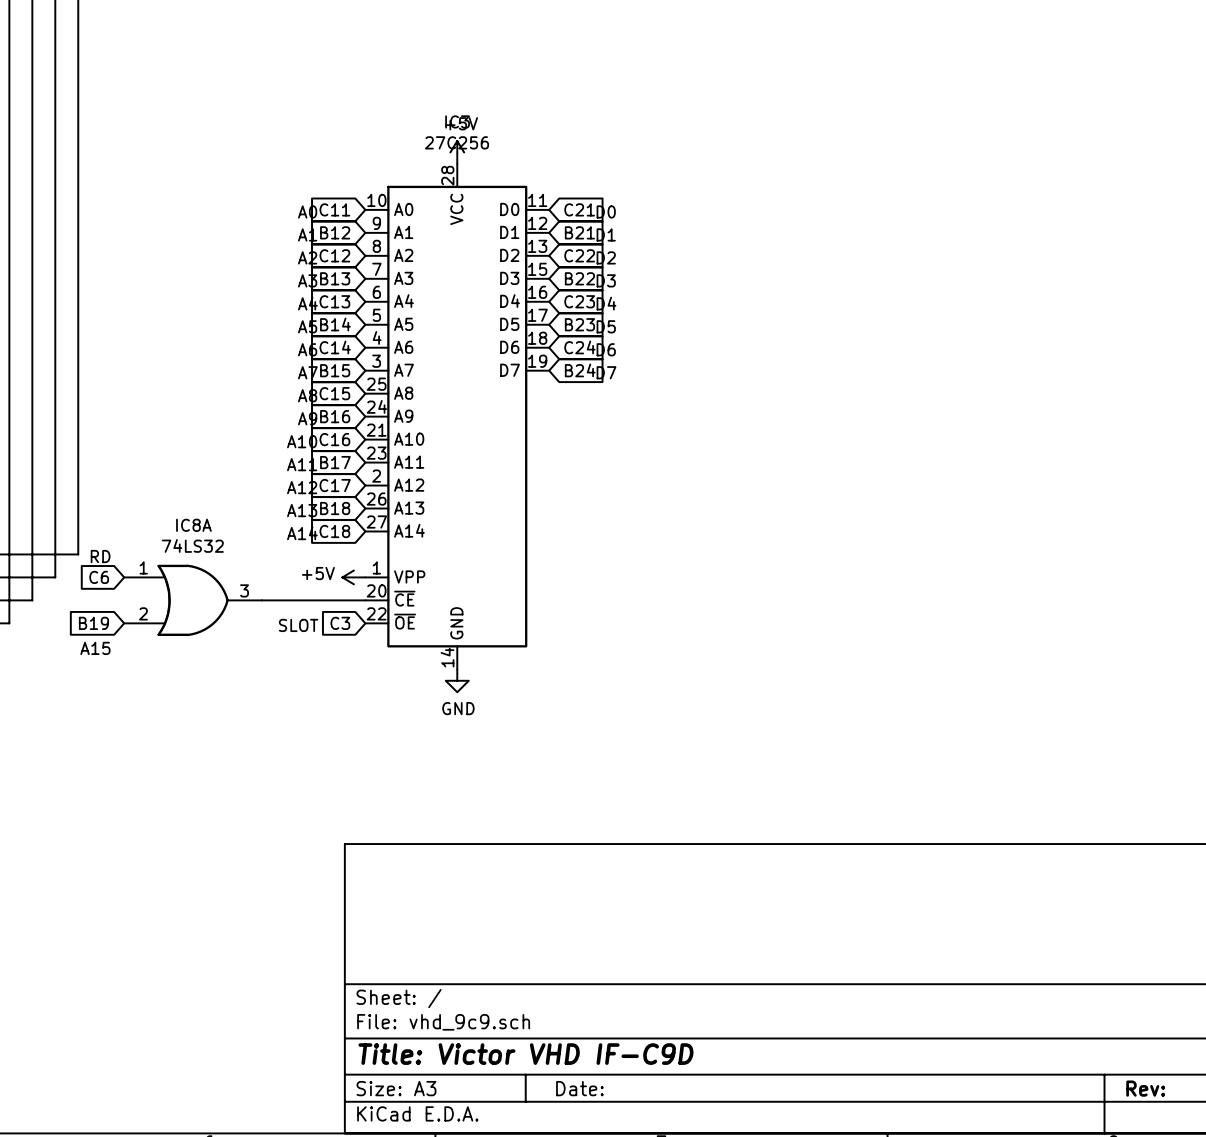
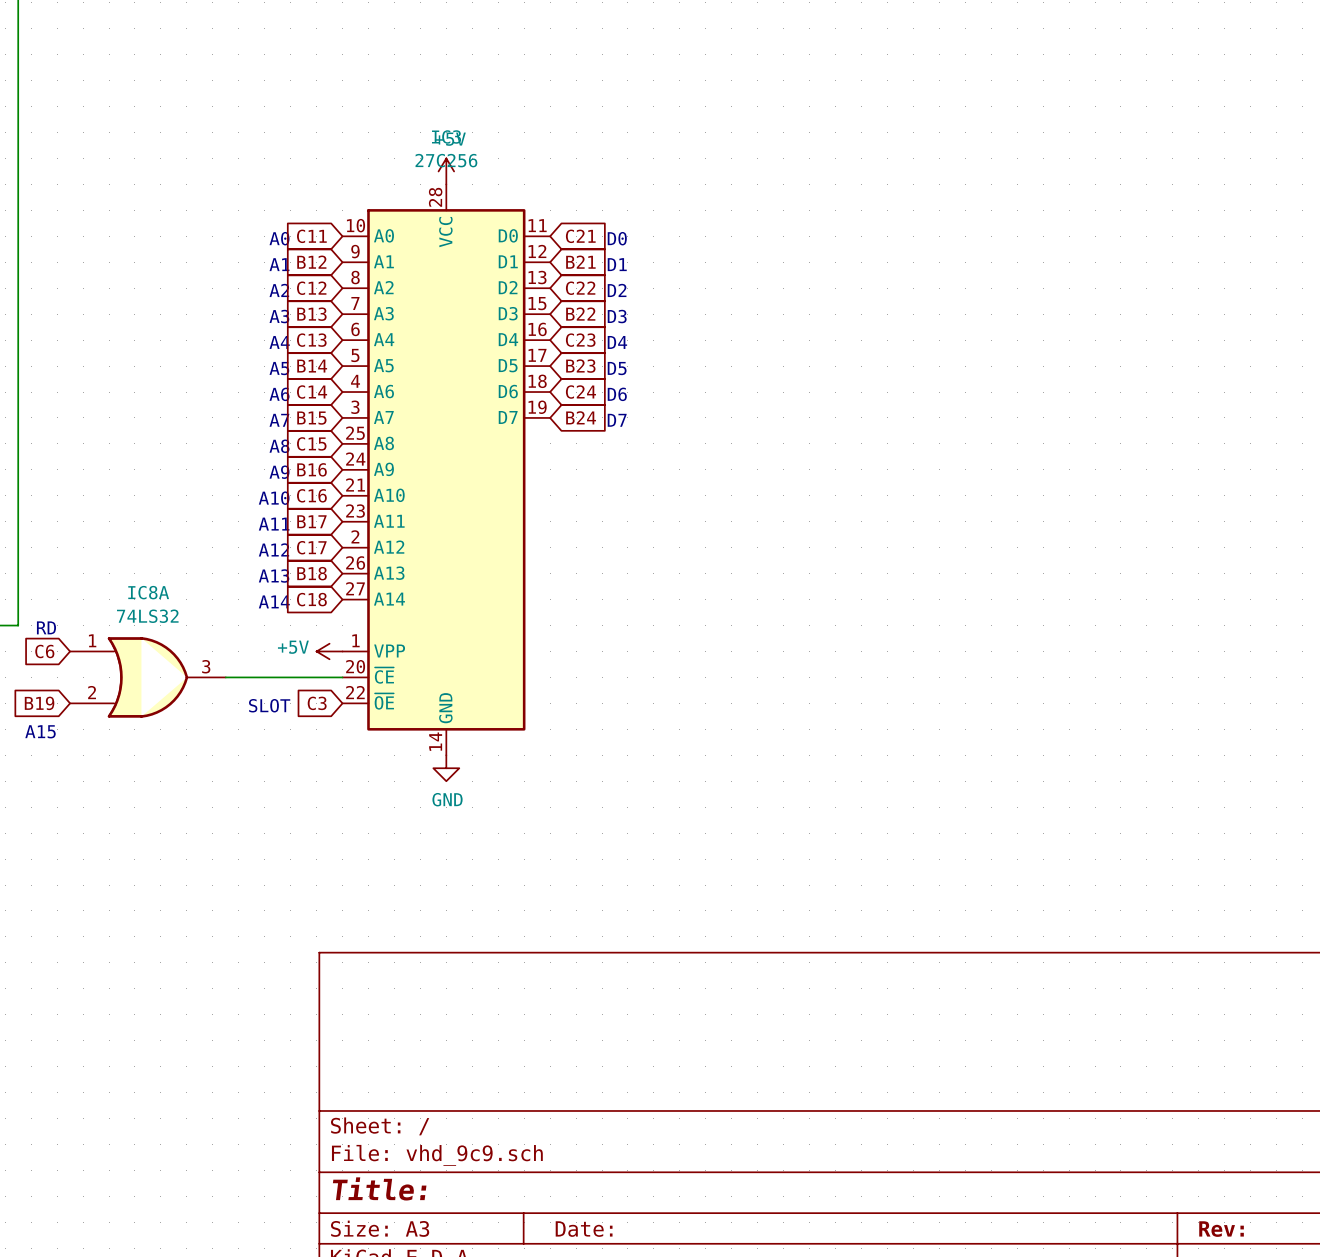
title block: Title: Victor VHD IF-C9D (526, 1054) -> Title: (379, 1188)

